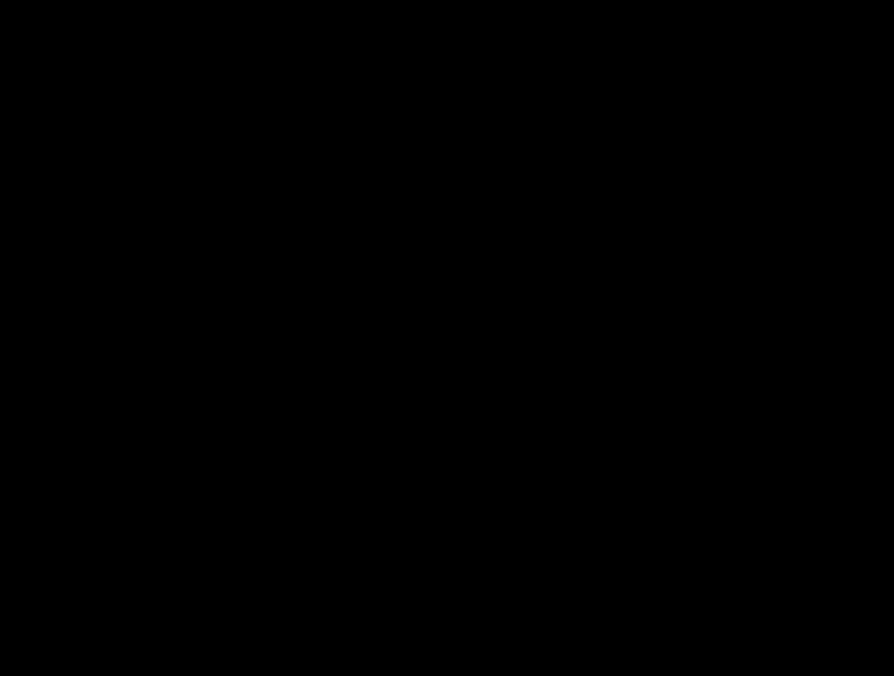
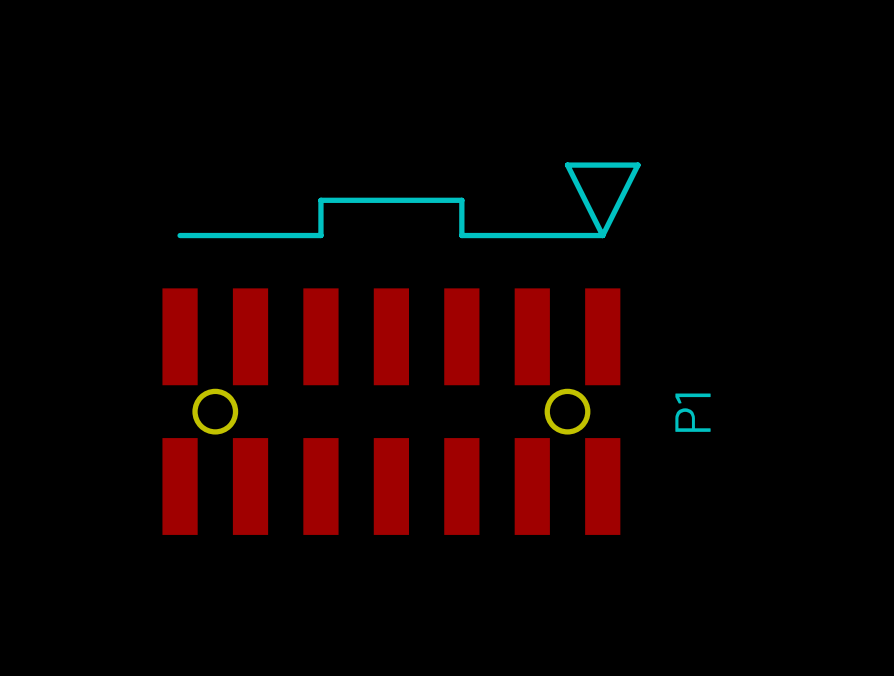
P1: none -> (401, 348)

